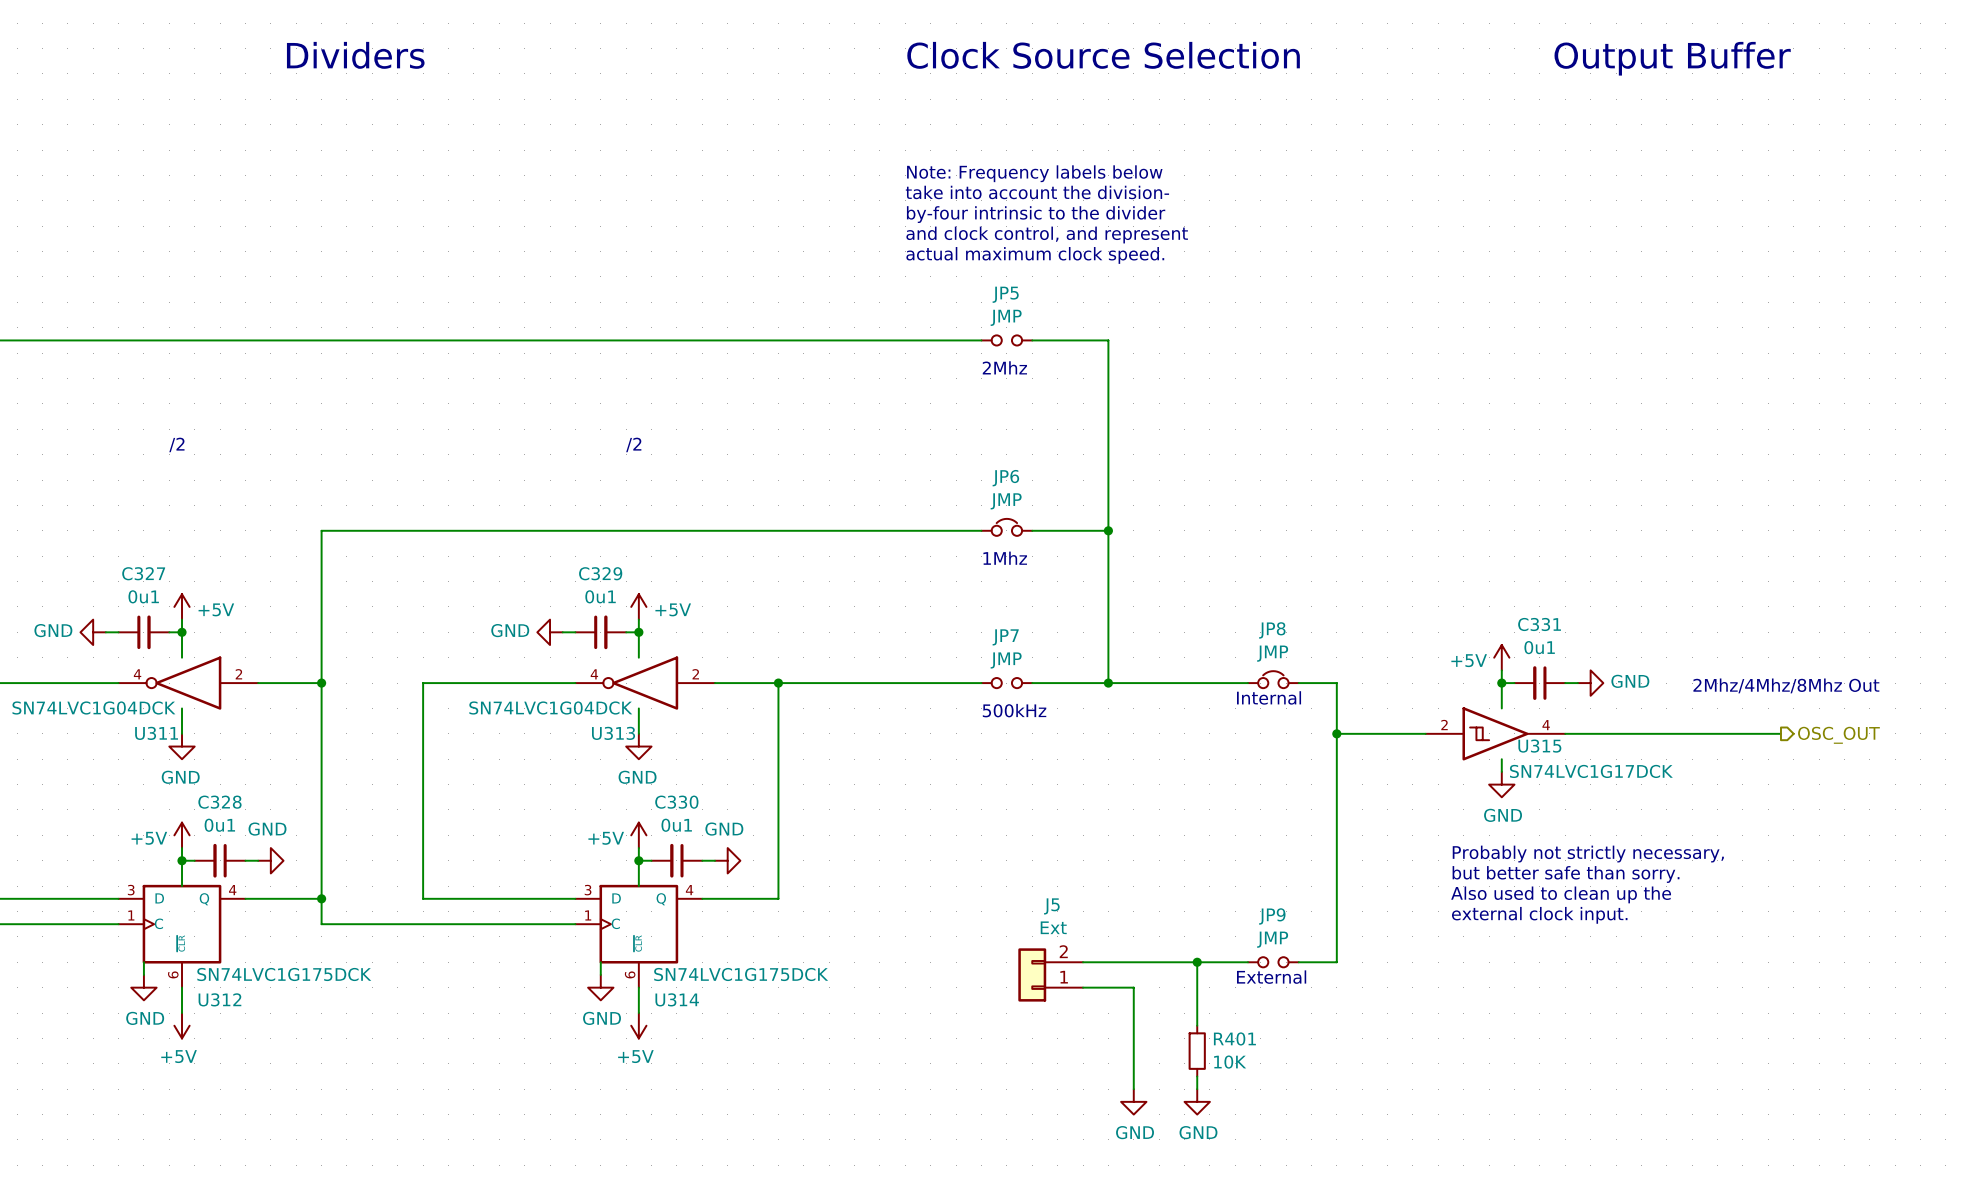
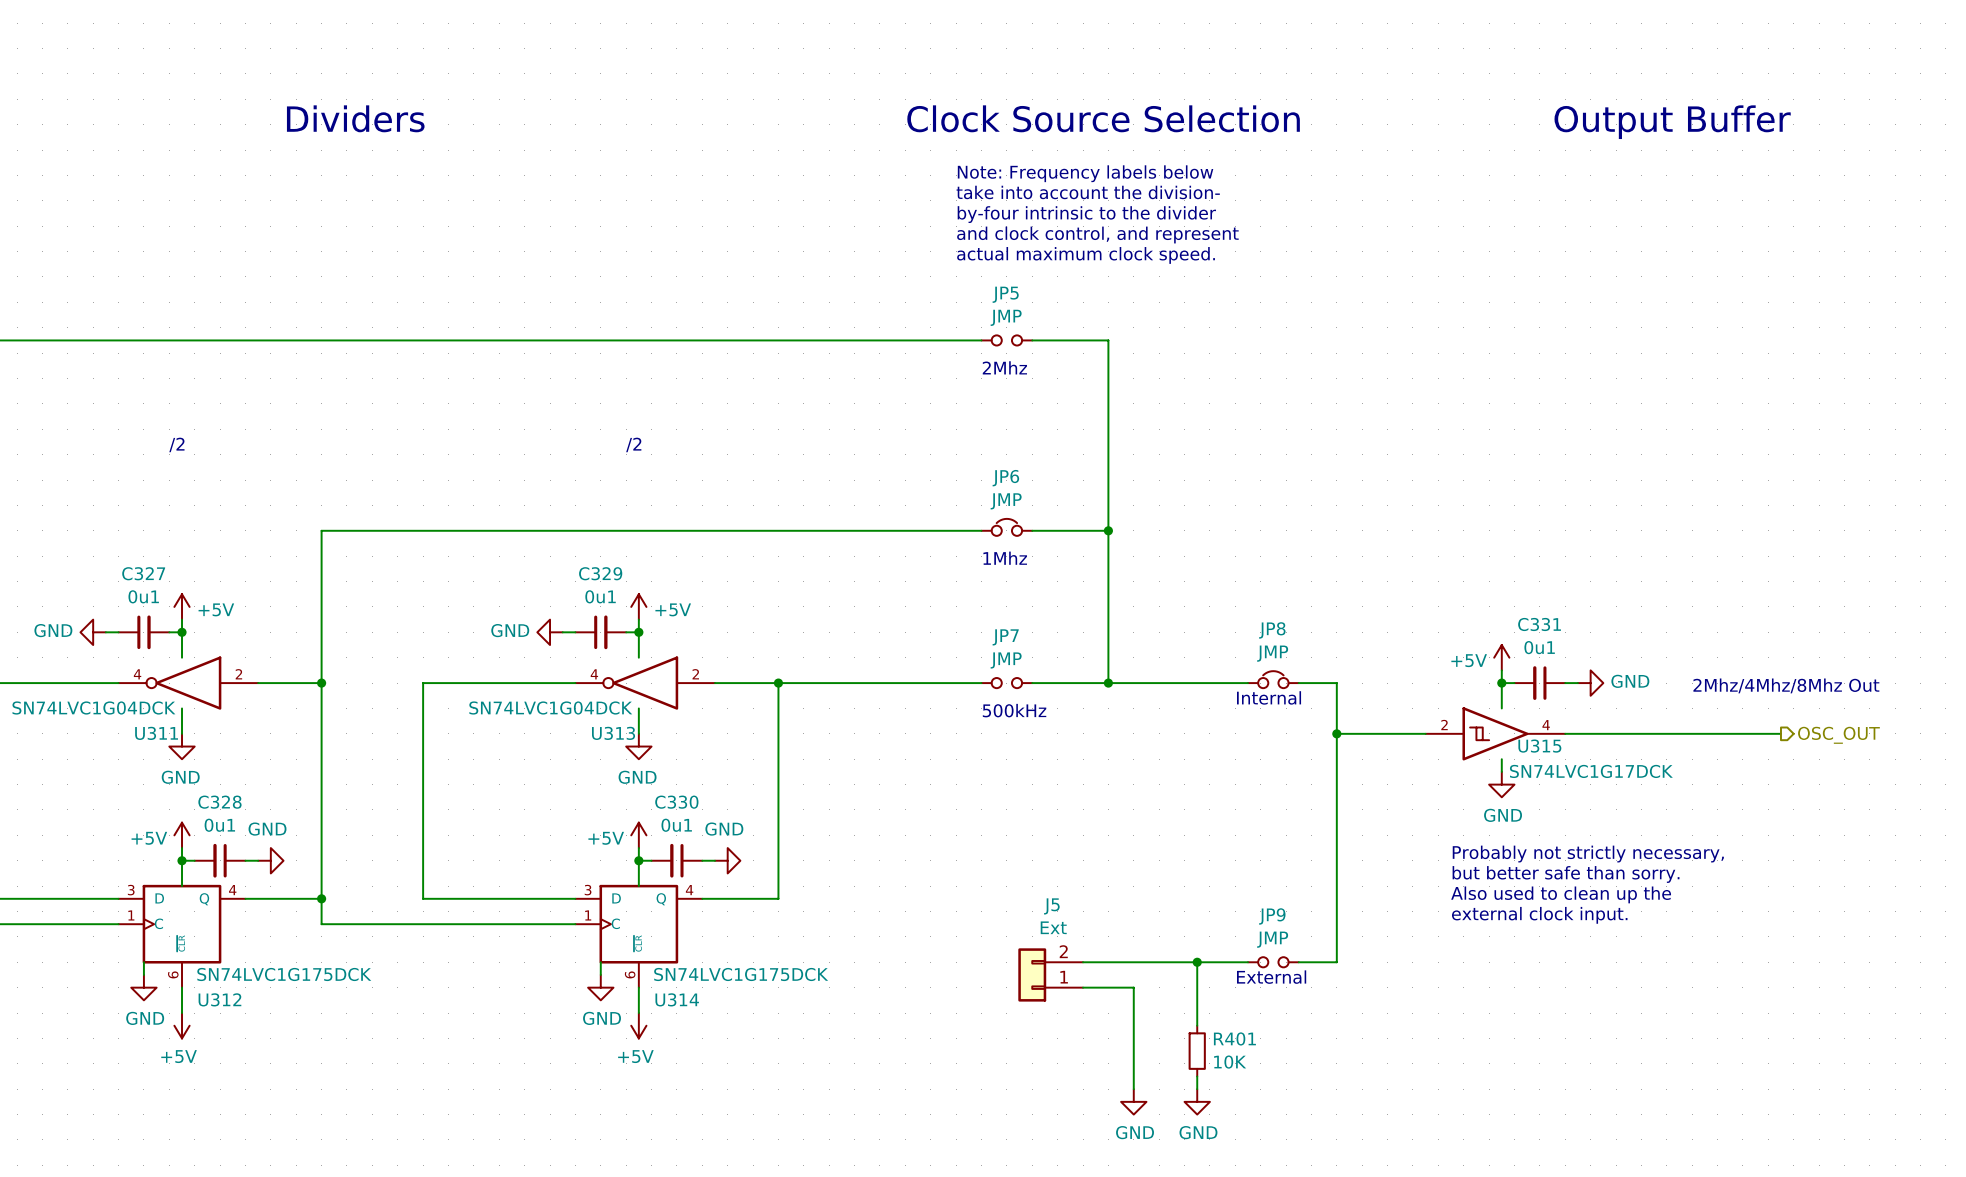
text position: Dividers (355, 55) -> Dividers (355, 118)
text position: Clock Source Selection (1103, 55) -> Clock Source Selection (1103, 118)
text position: Output Buffer (1672, 58) -> Output Buffer (1672, 122)
text position: Note: Frequency labels below (1034, 173) -> Note: Frequency labels below (1085, 173)
text position: take into account the division- (1037, 192) -> take into account the division- (1088, 192)
text position: by-four intrinsic to the divider (1036, 214) -> by-four intrinsic to the divider (1086, 214)
text position: and clock control, and represent (1047, 235) -> and clock control, and represent (1097, 235)
text position: actual maximum clock speed. (1035, 255) -> actual maximum clock speed. (1086, 255)

